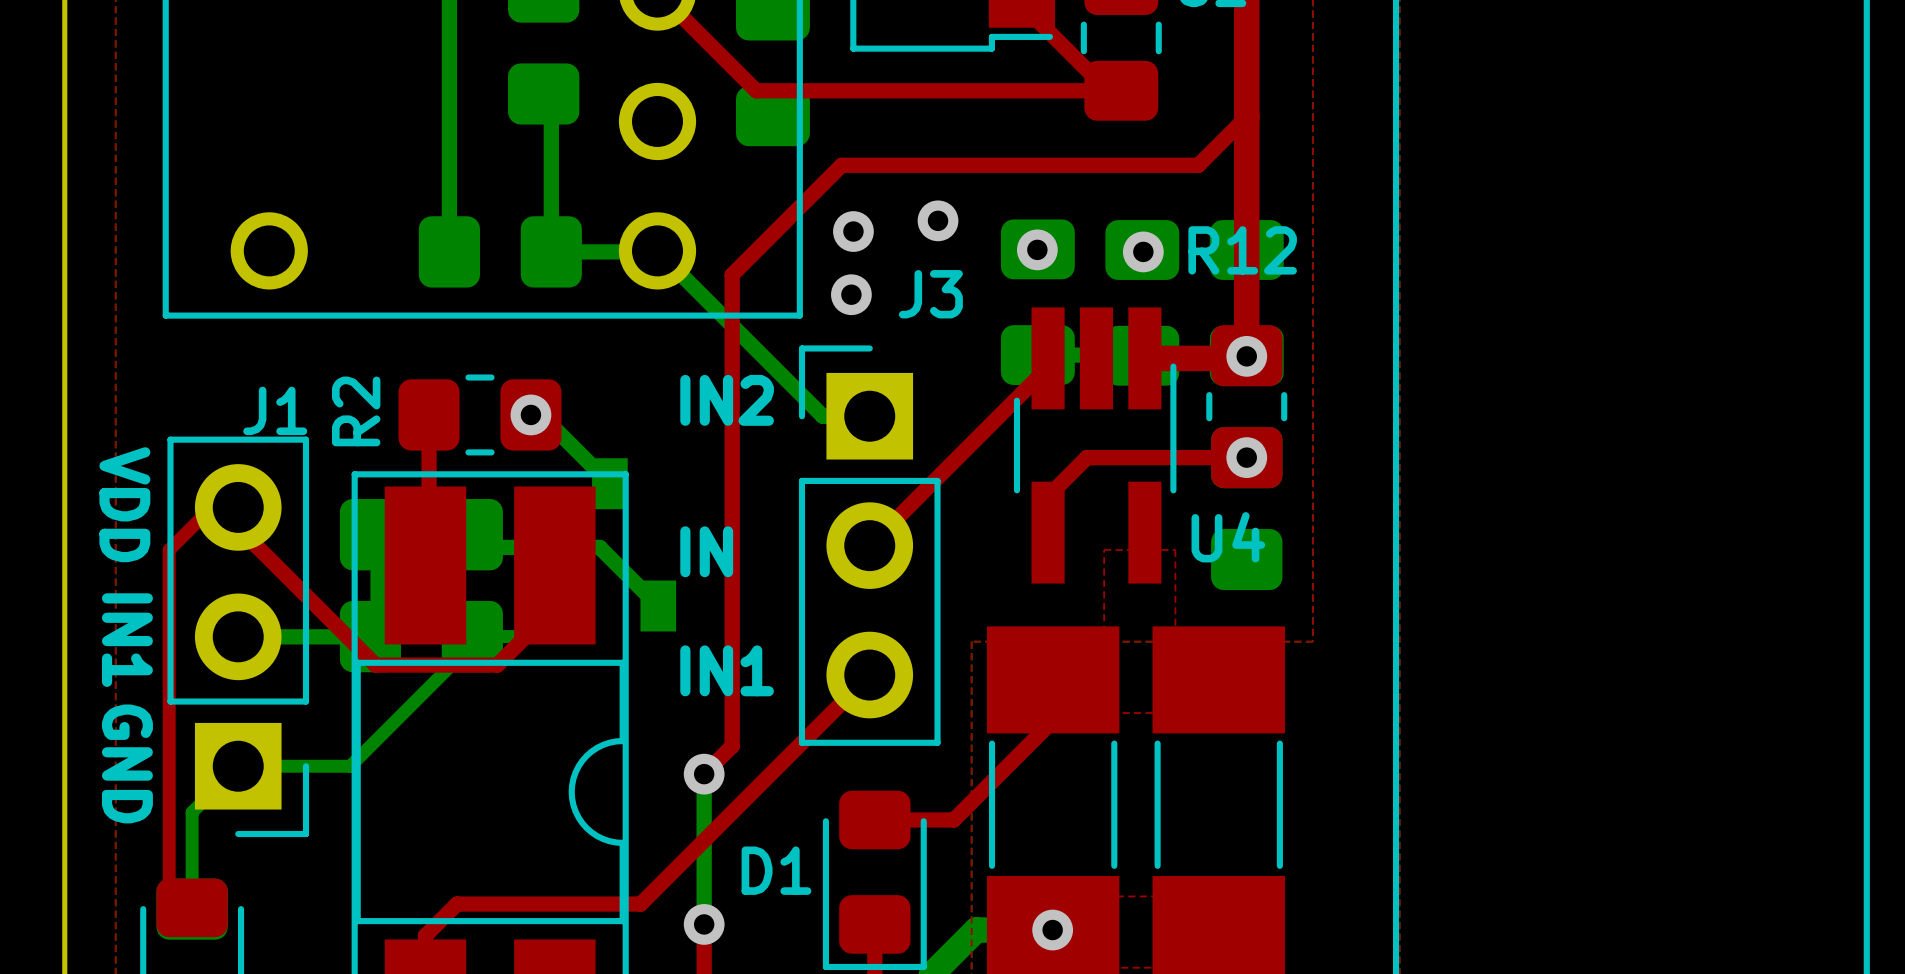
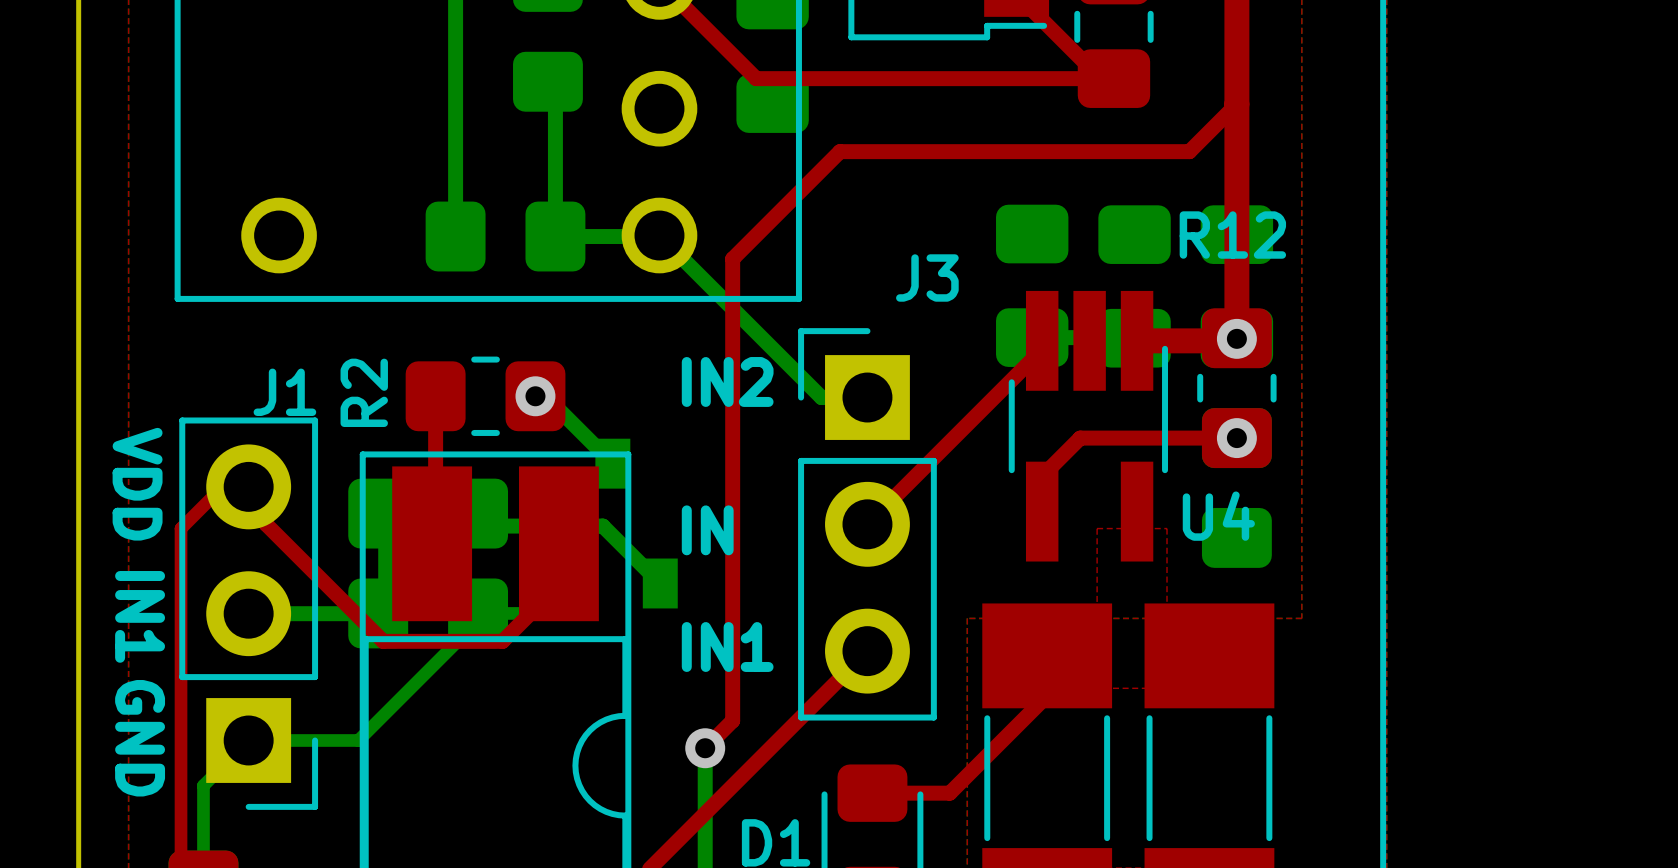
via: (938, 220) -> none
via: (853, 231) -> none
via: (1037, 249) -> none
via: (1143, 251) -> none
via: (851, 294) -> none

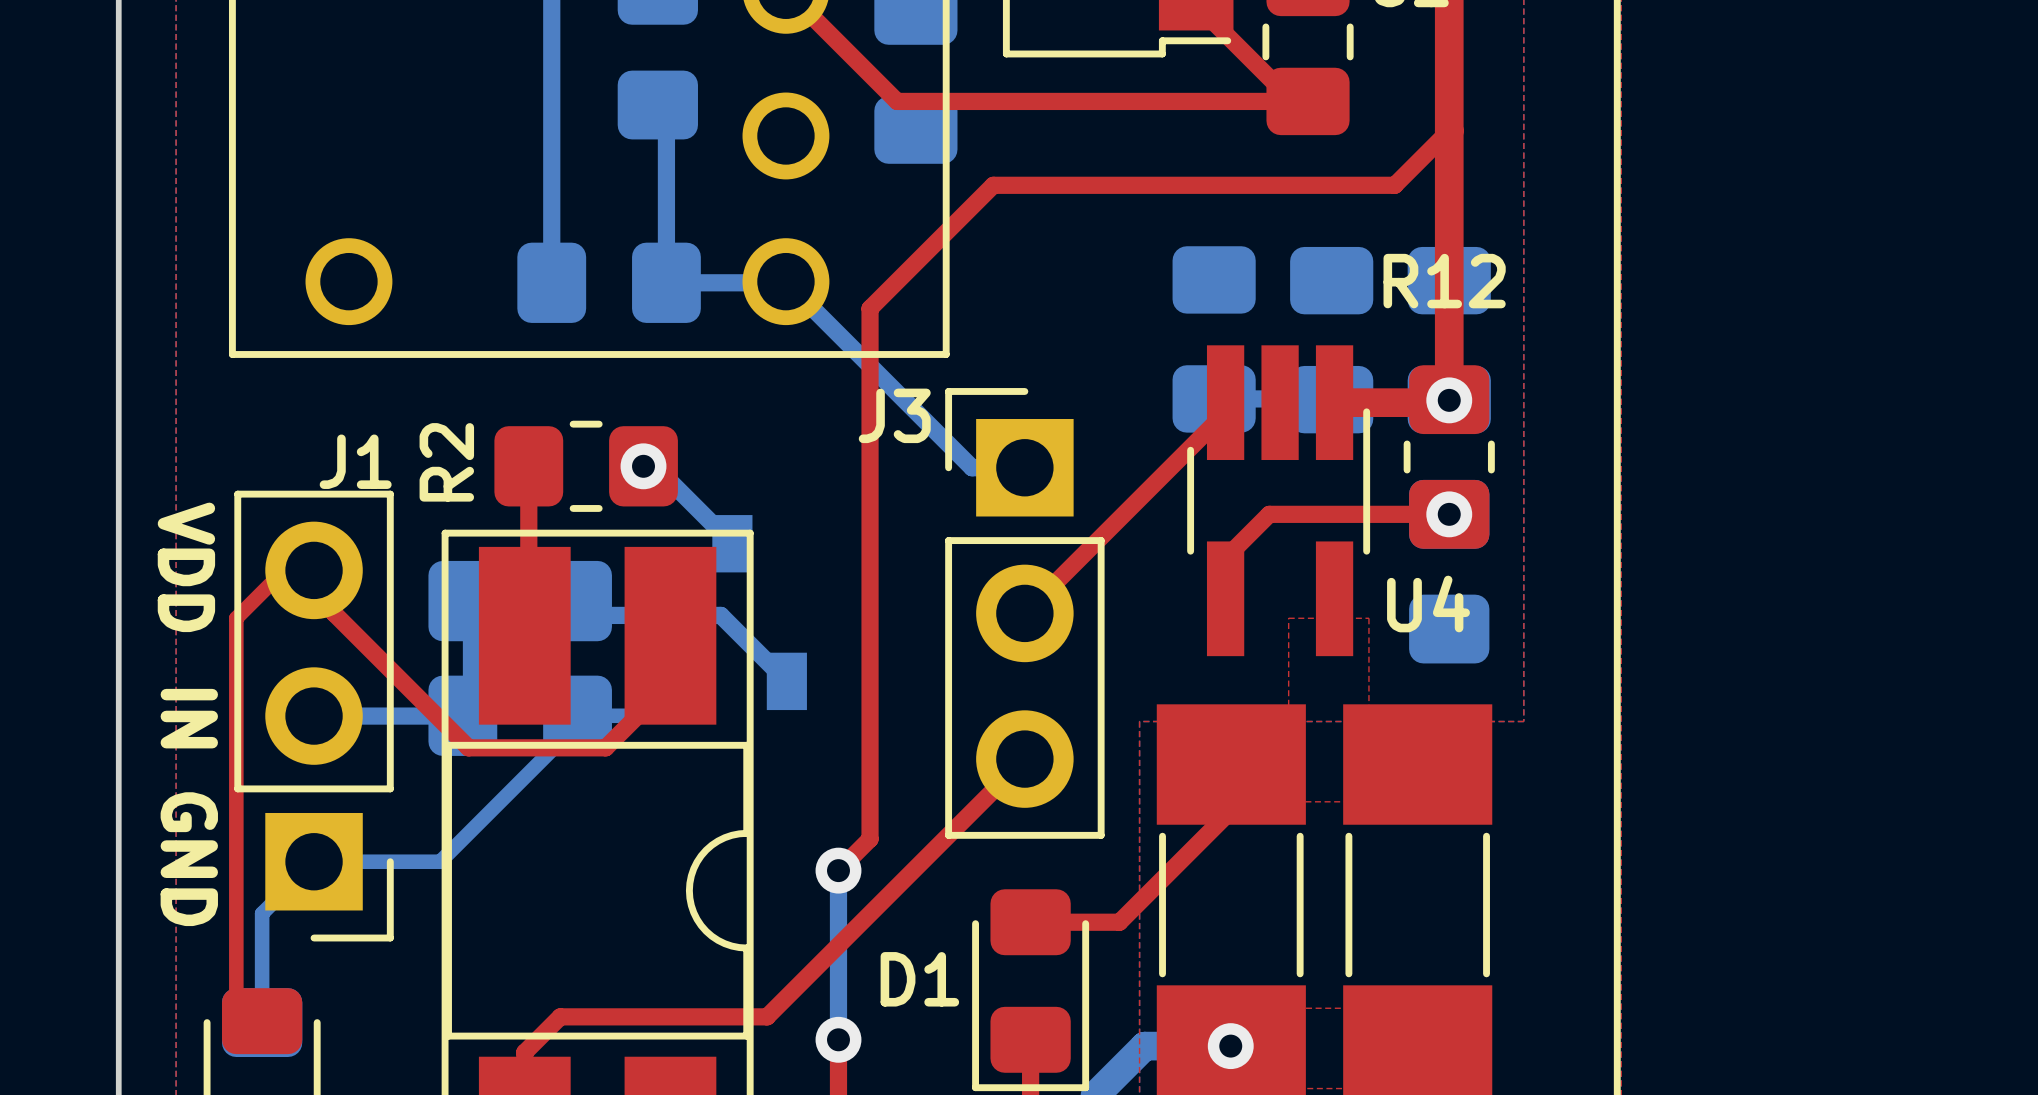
J3 name position: J3 (927, 278) -> J3 (894, 415)
text: IN2 (727, 381) -> none
text: IN (707, 530) -> none
text: IN1 (140, 616) -> IN (189, 718)
text: IN1 (727, 647) -> none

